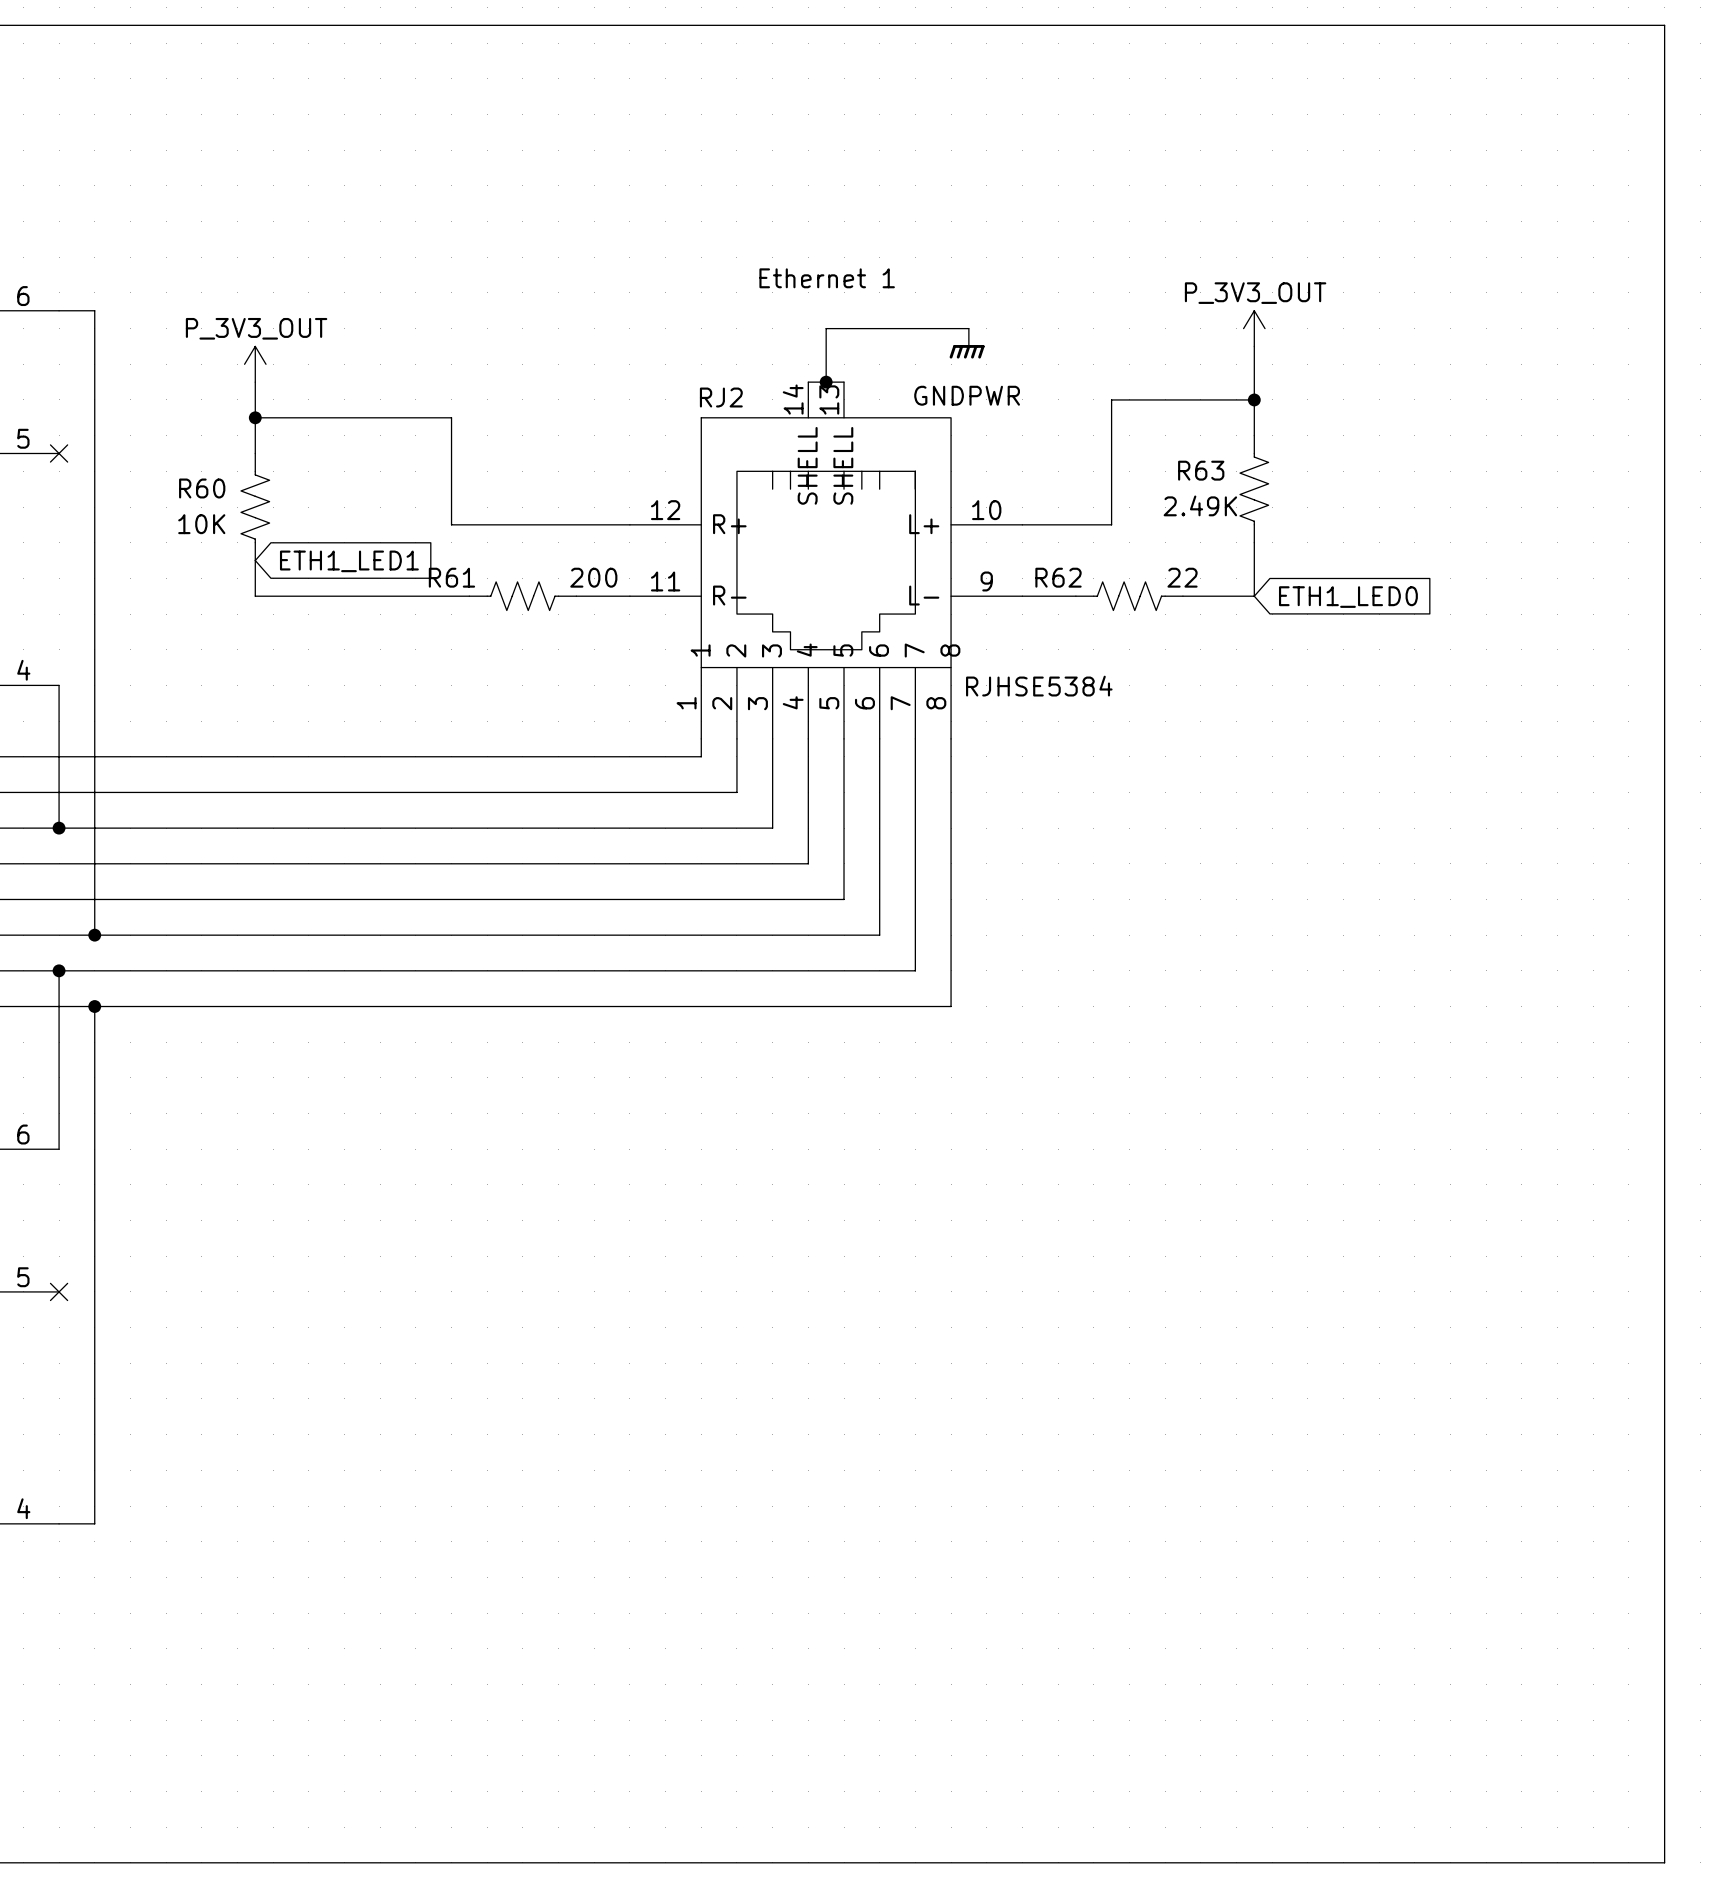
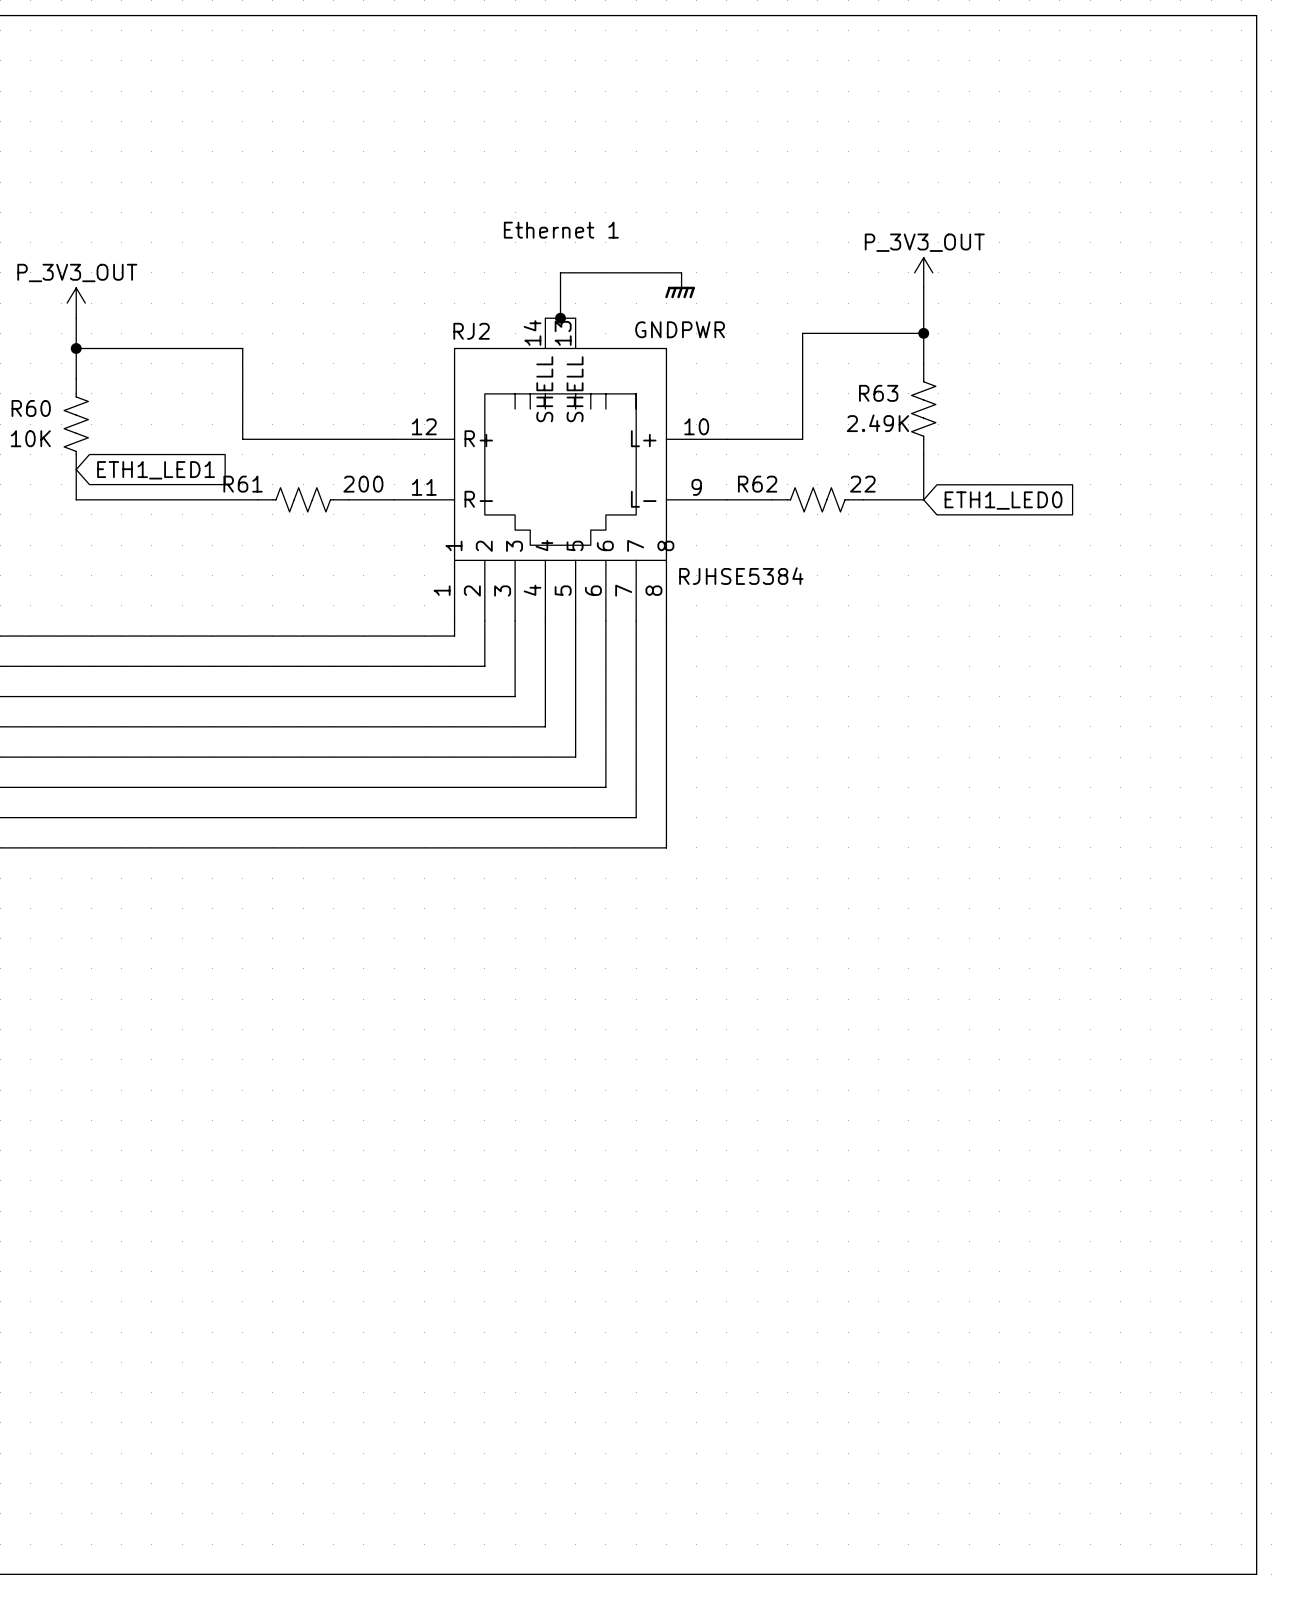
line: (1646, 25) (1664, 25) (1664, 1862) (1646, 1862) -> (1256, 15) (1256, 1574)

